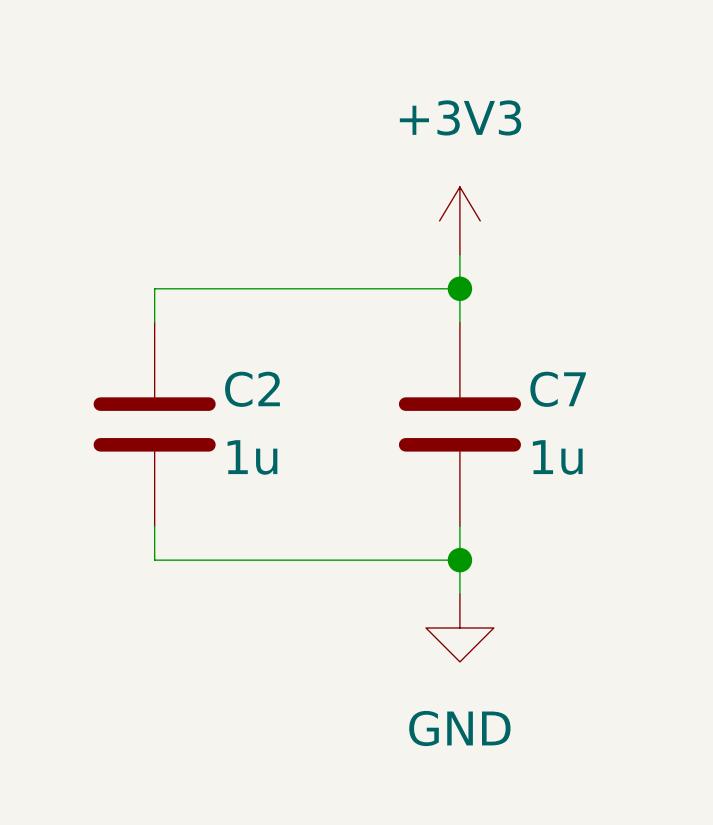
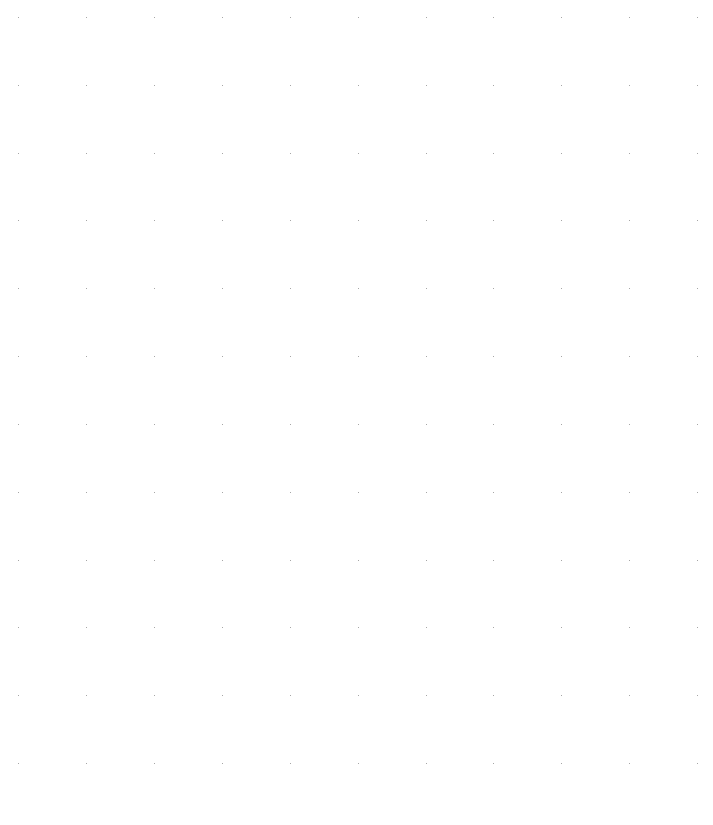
power symbol: +3V3 (459, 220) -> none
wire: (459, 254) (459, 322) -> none
wire: (459, 288) (154, 288) (154, 322) -> none
junction: (459, 288) -> none
C2: 1u (154, 424) -> none
C7: 1u (459, 424) -> none
wire: (154, 526) (154, 560) (459, 560) -> none
wire: (459, 526) (459, 594) -> none
junction: (459, 560) -> none
power symbol: GND (459, 627) -> none

